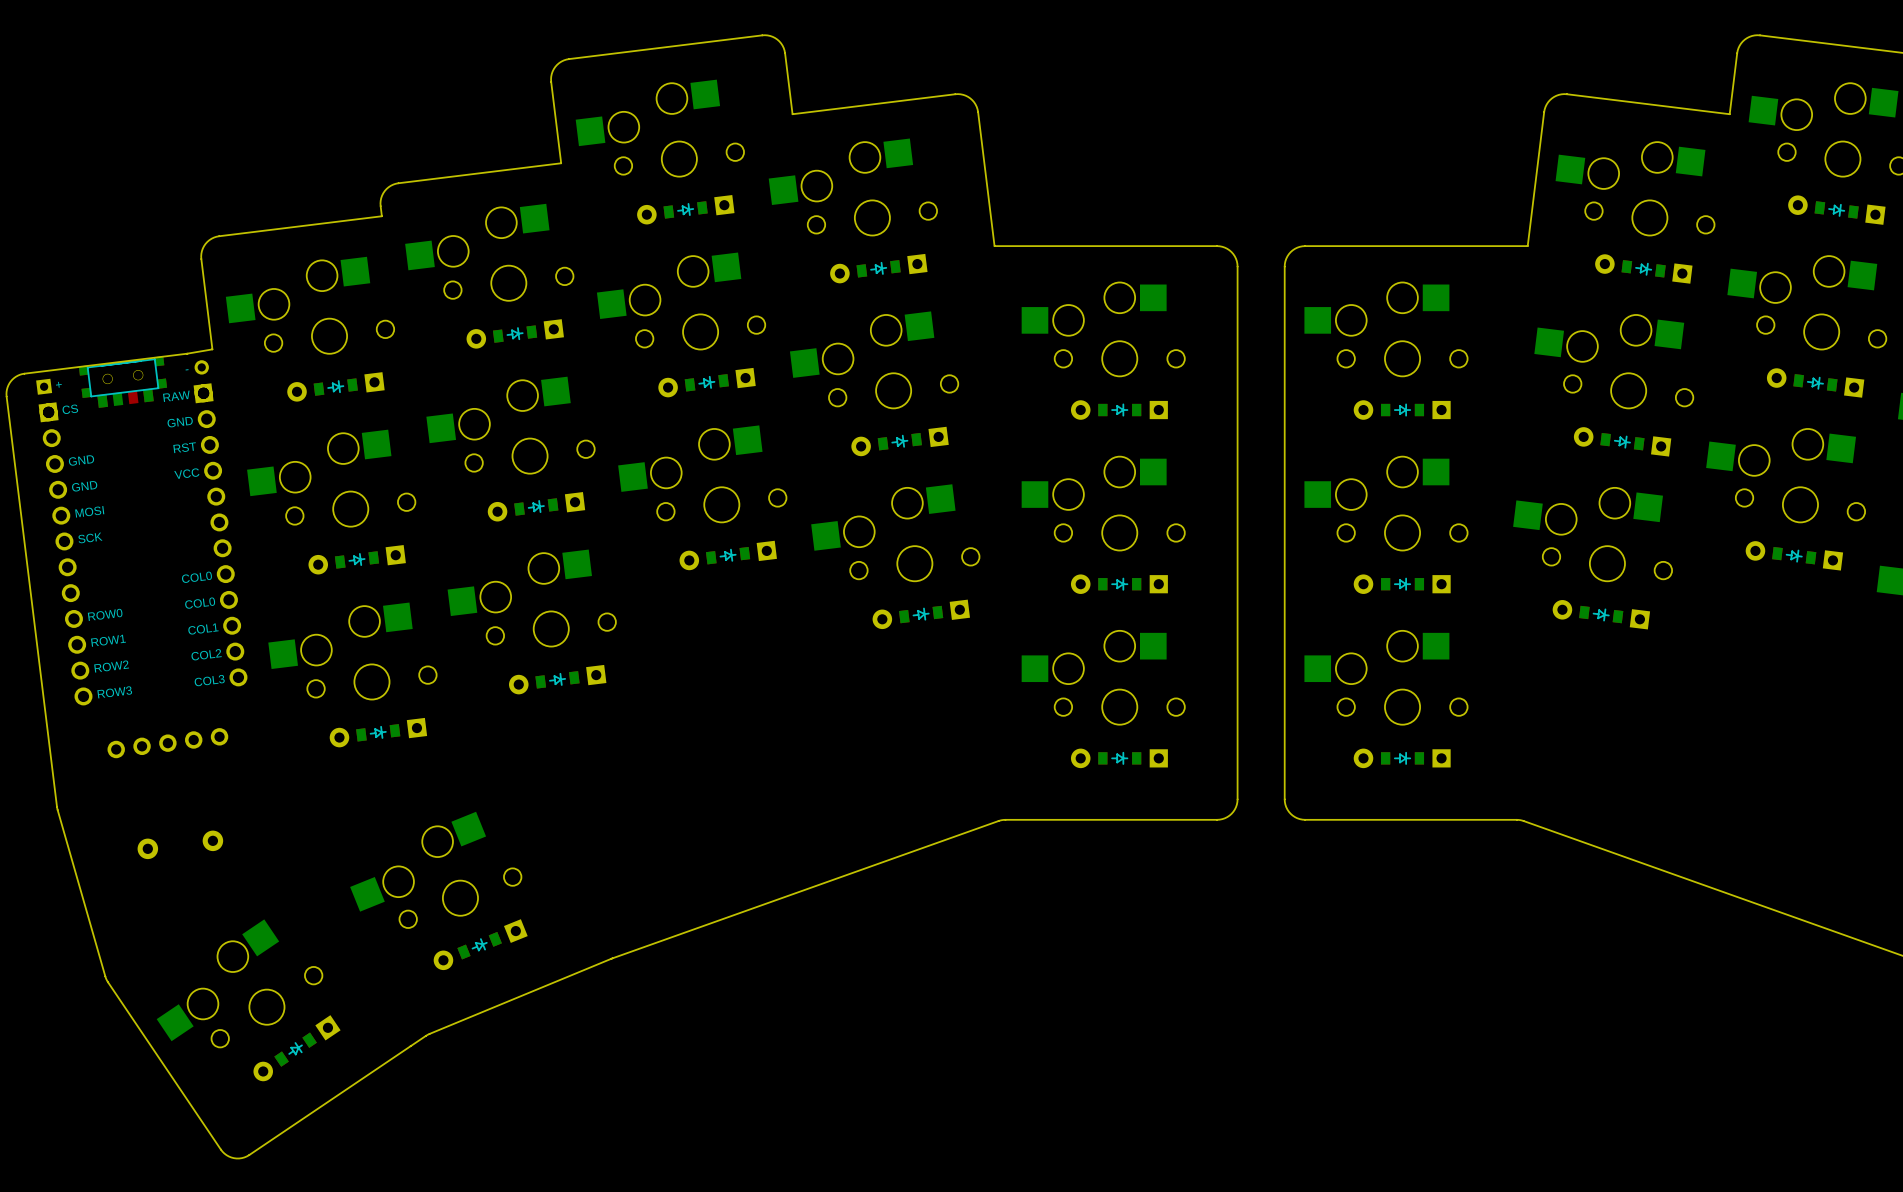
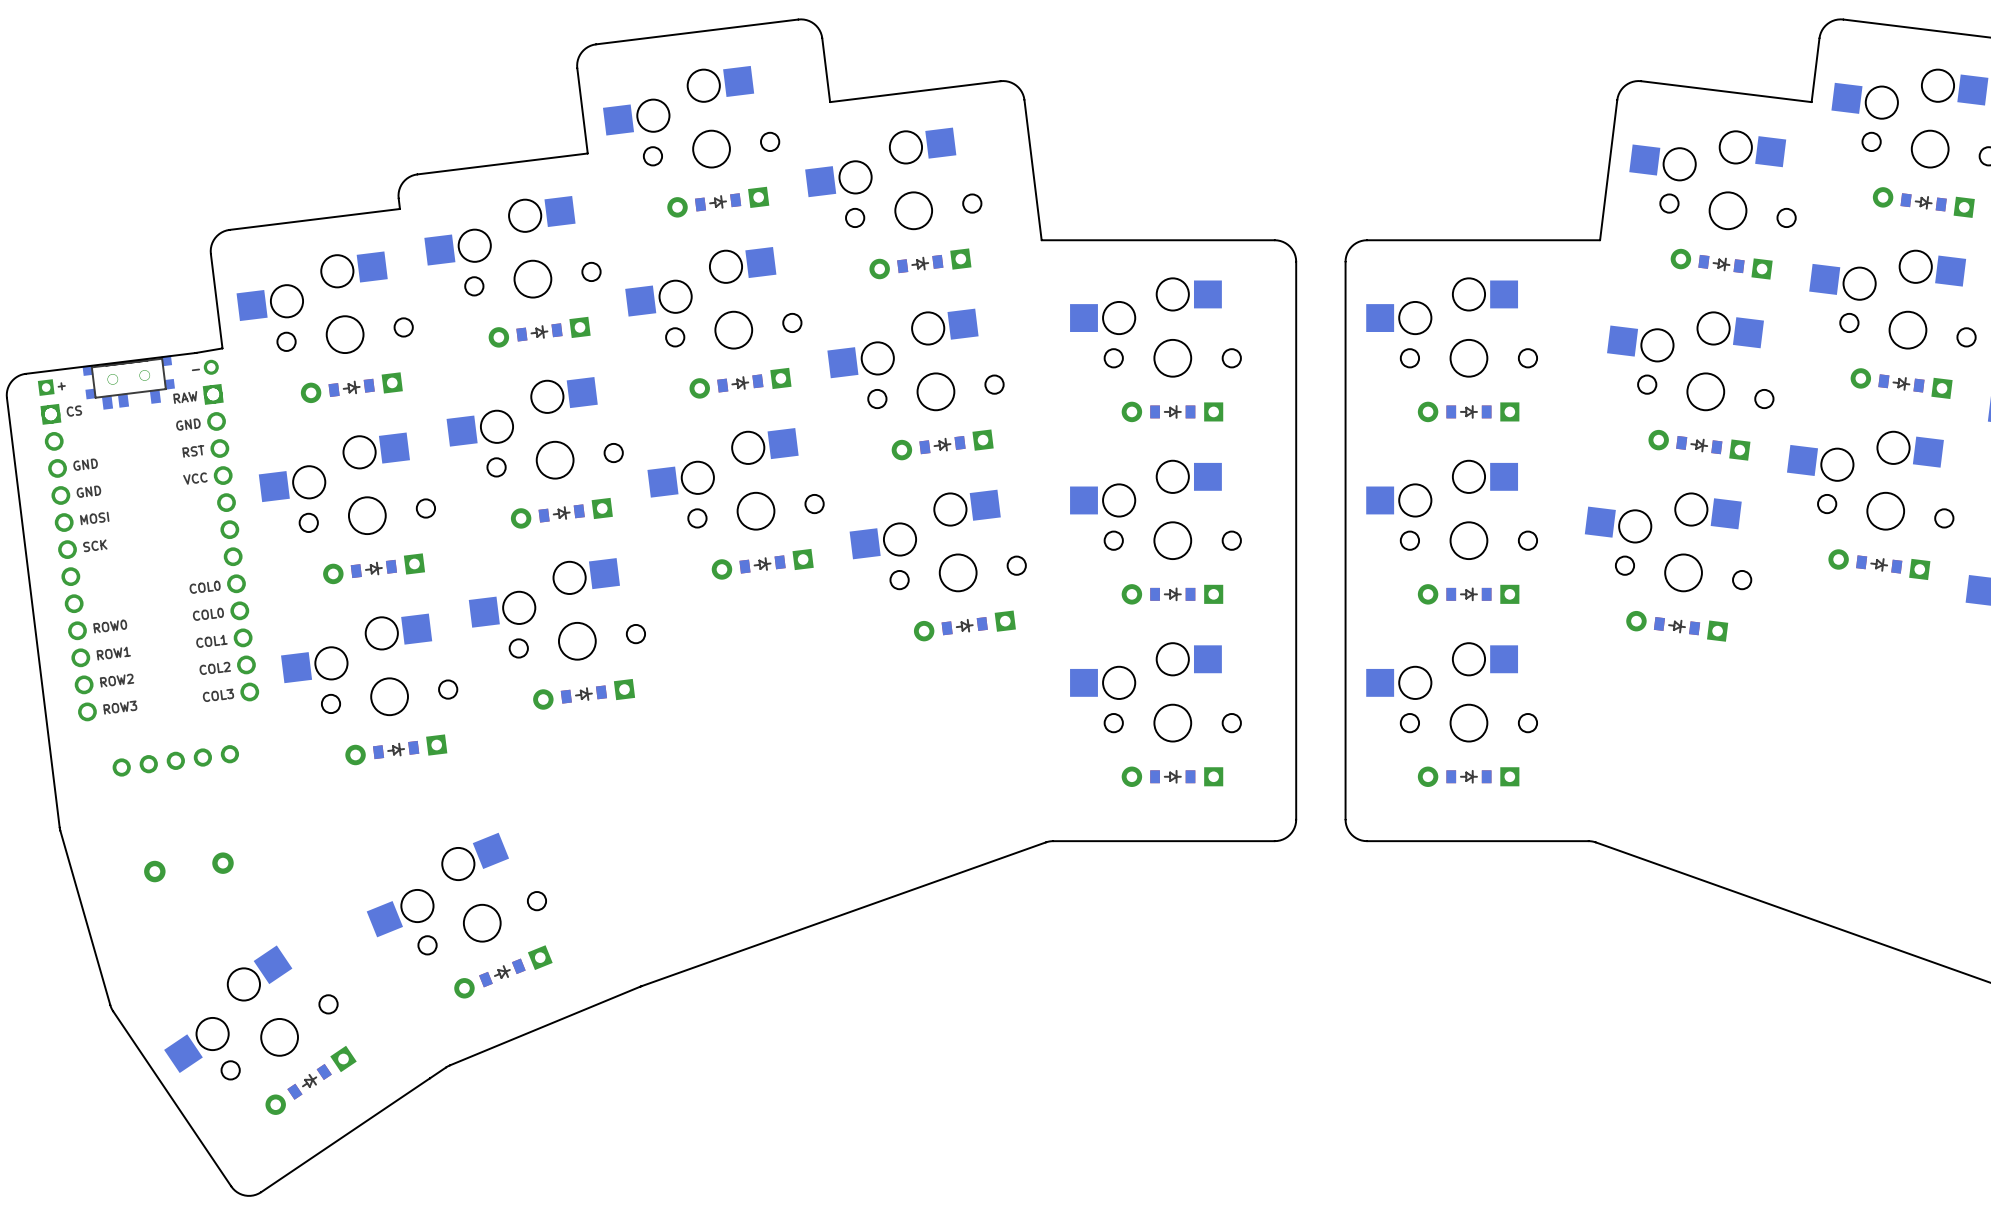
part footprint: [78, 356, 168, 408] -> [82, 355, 175, 410]

